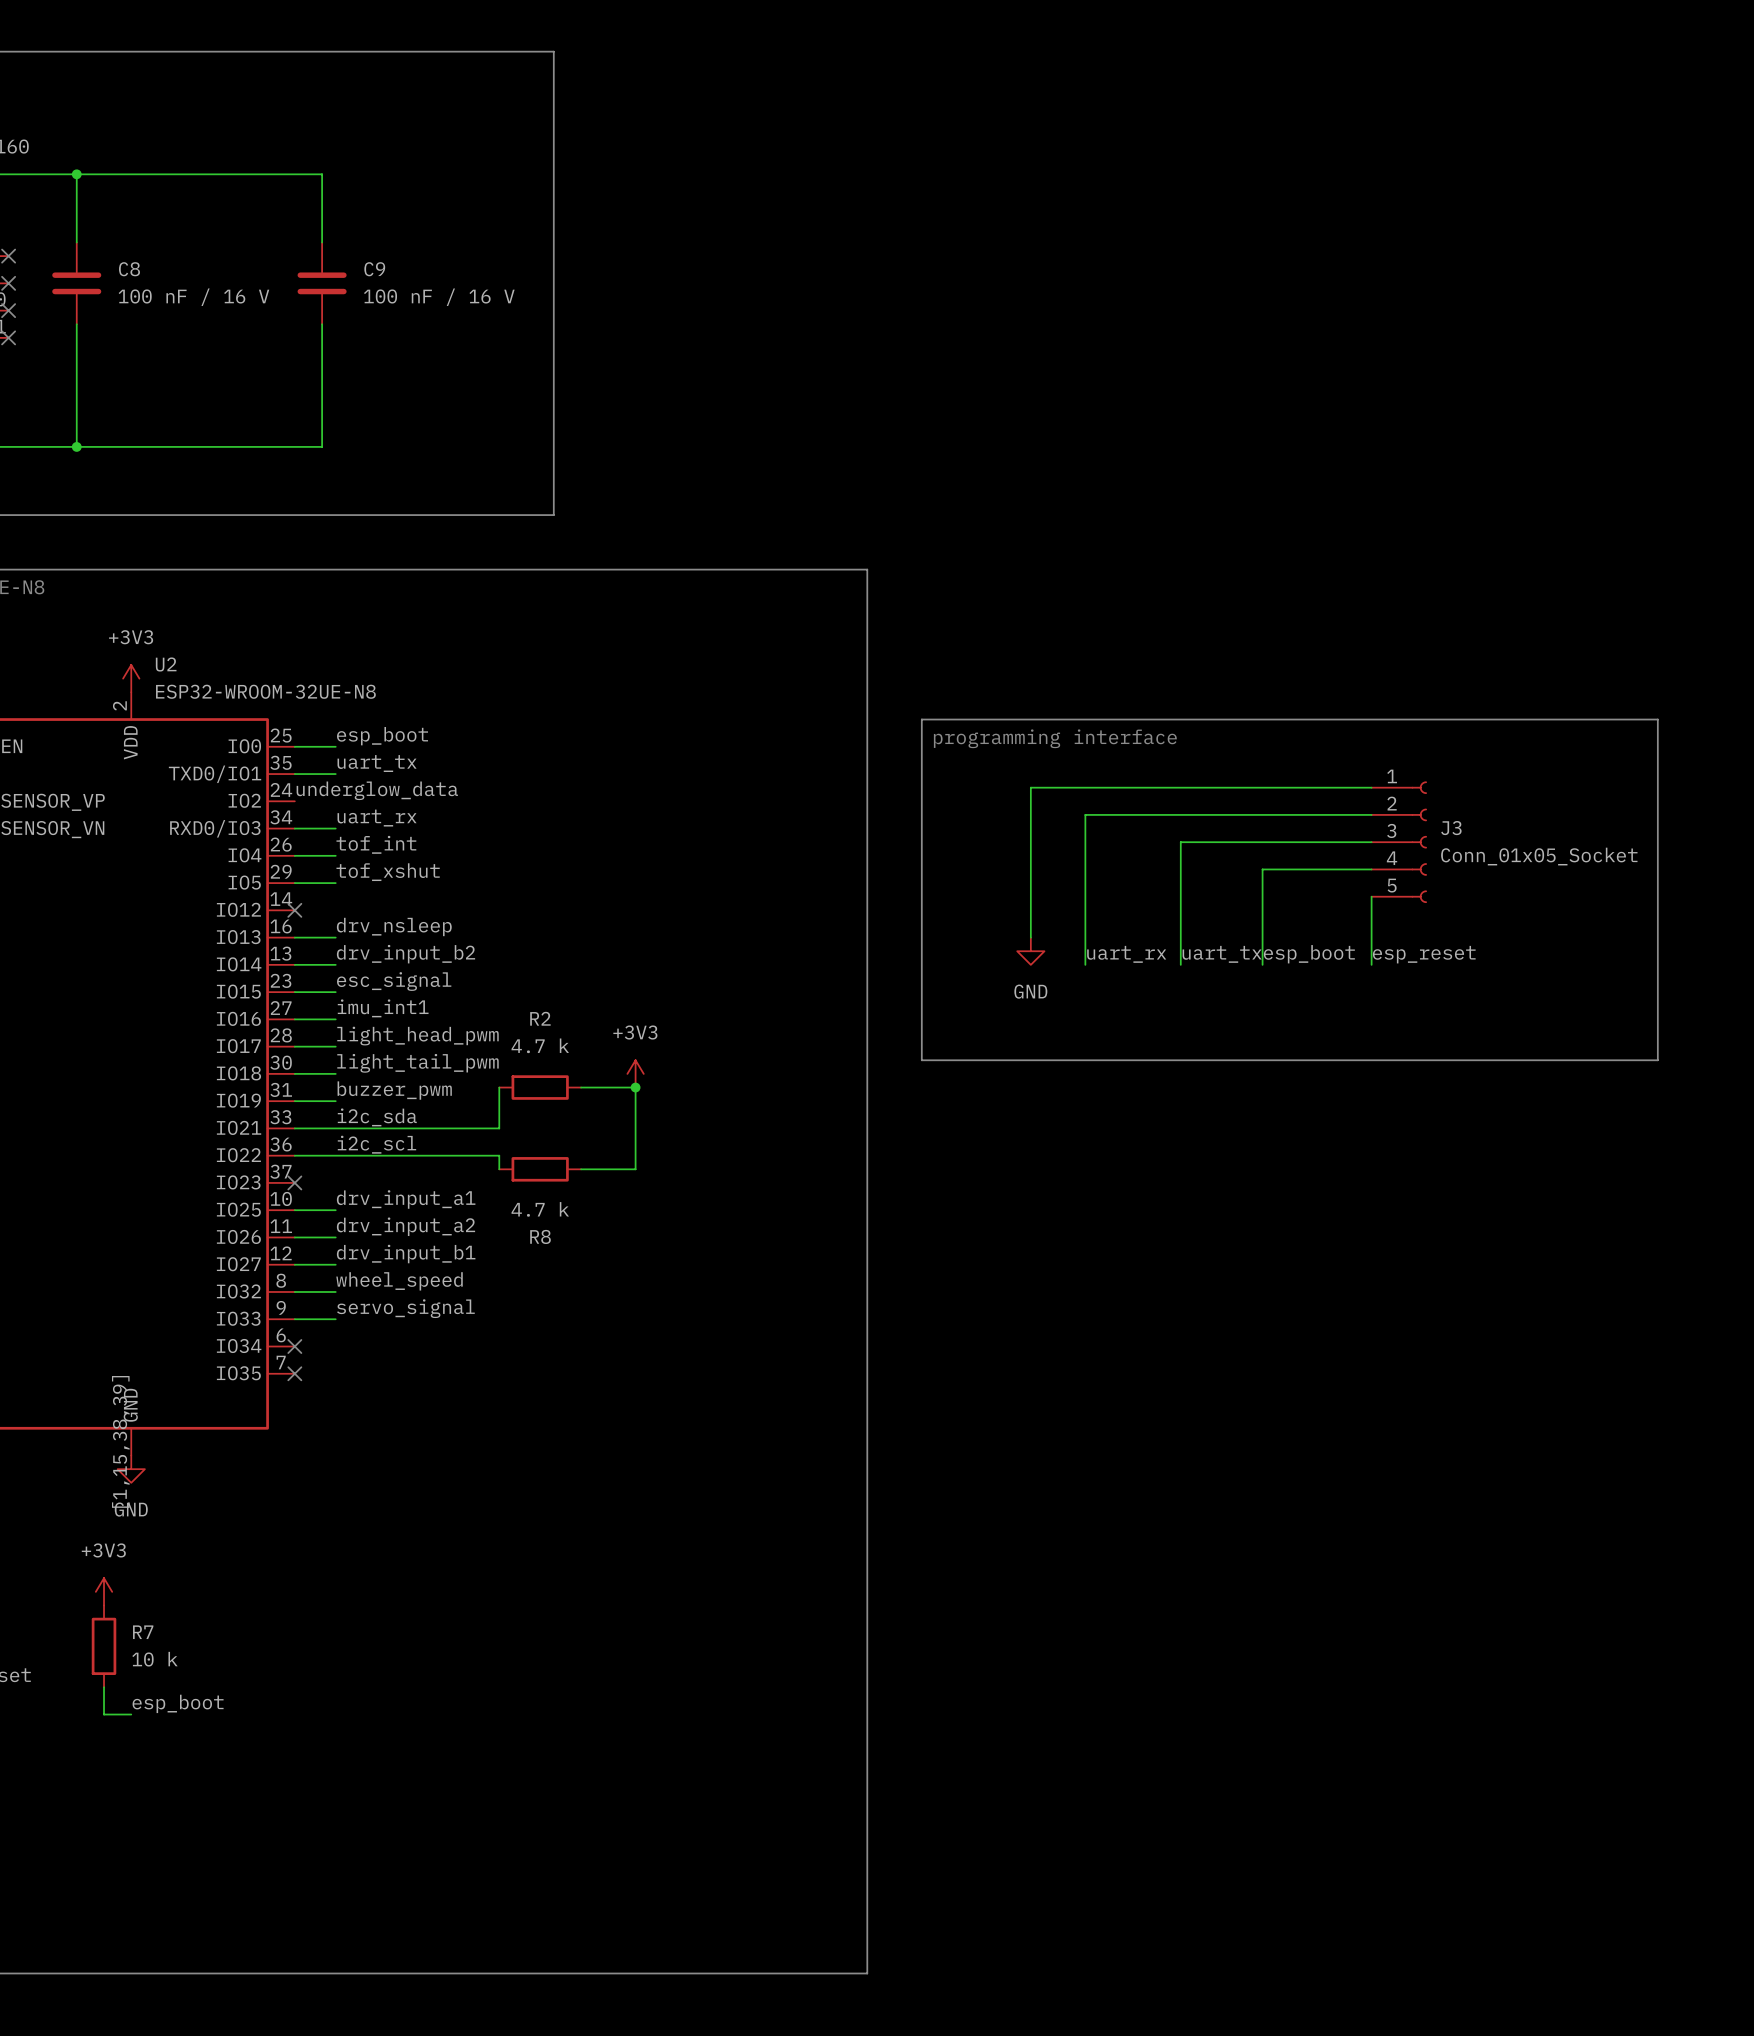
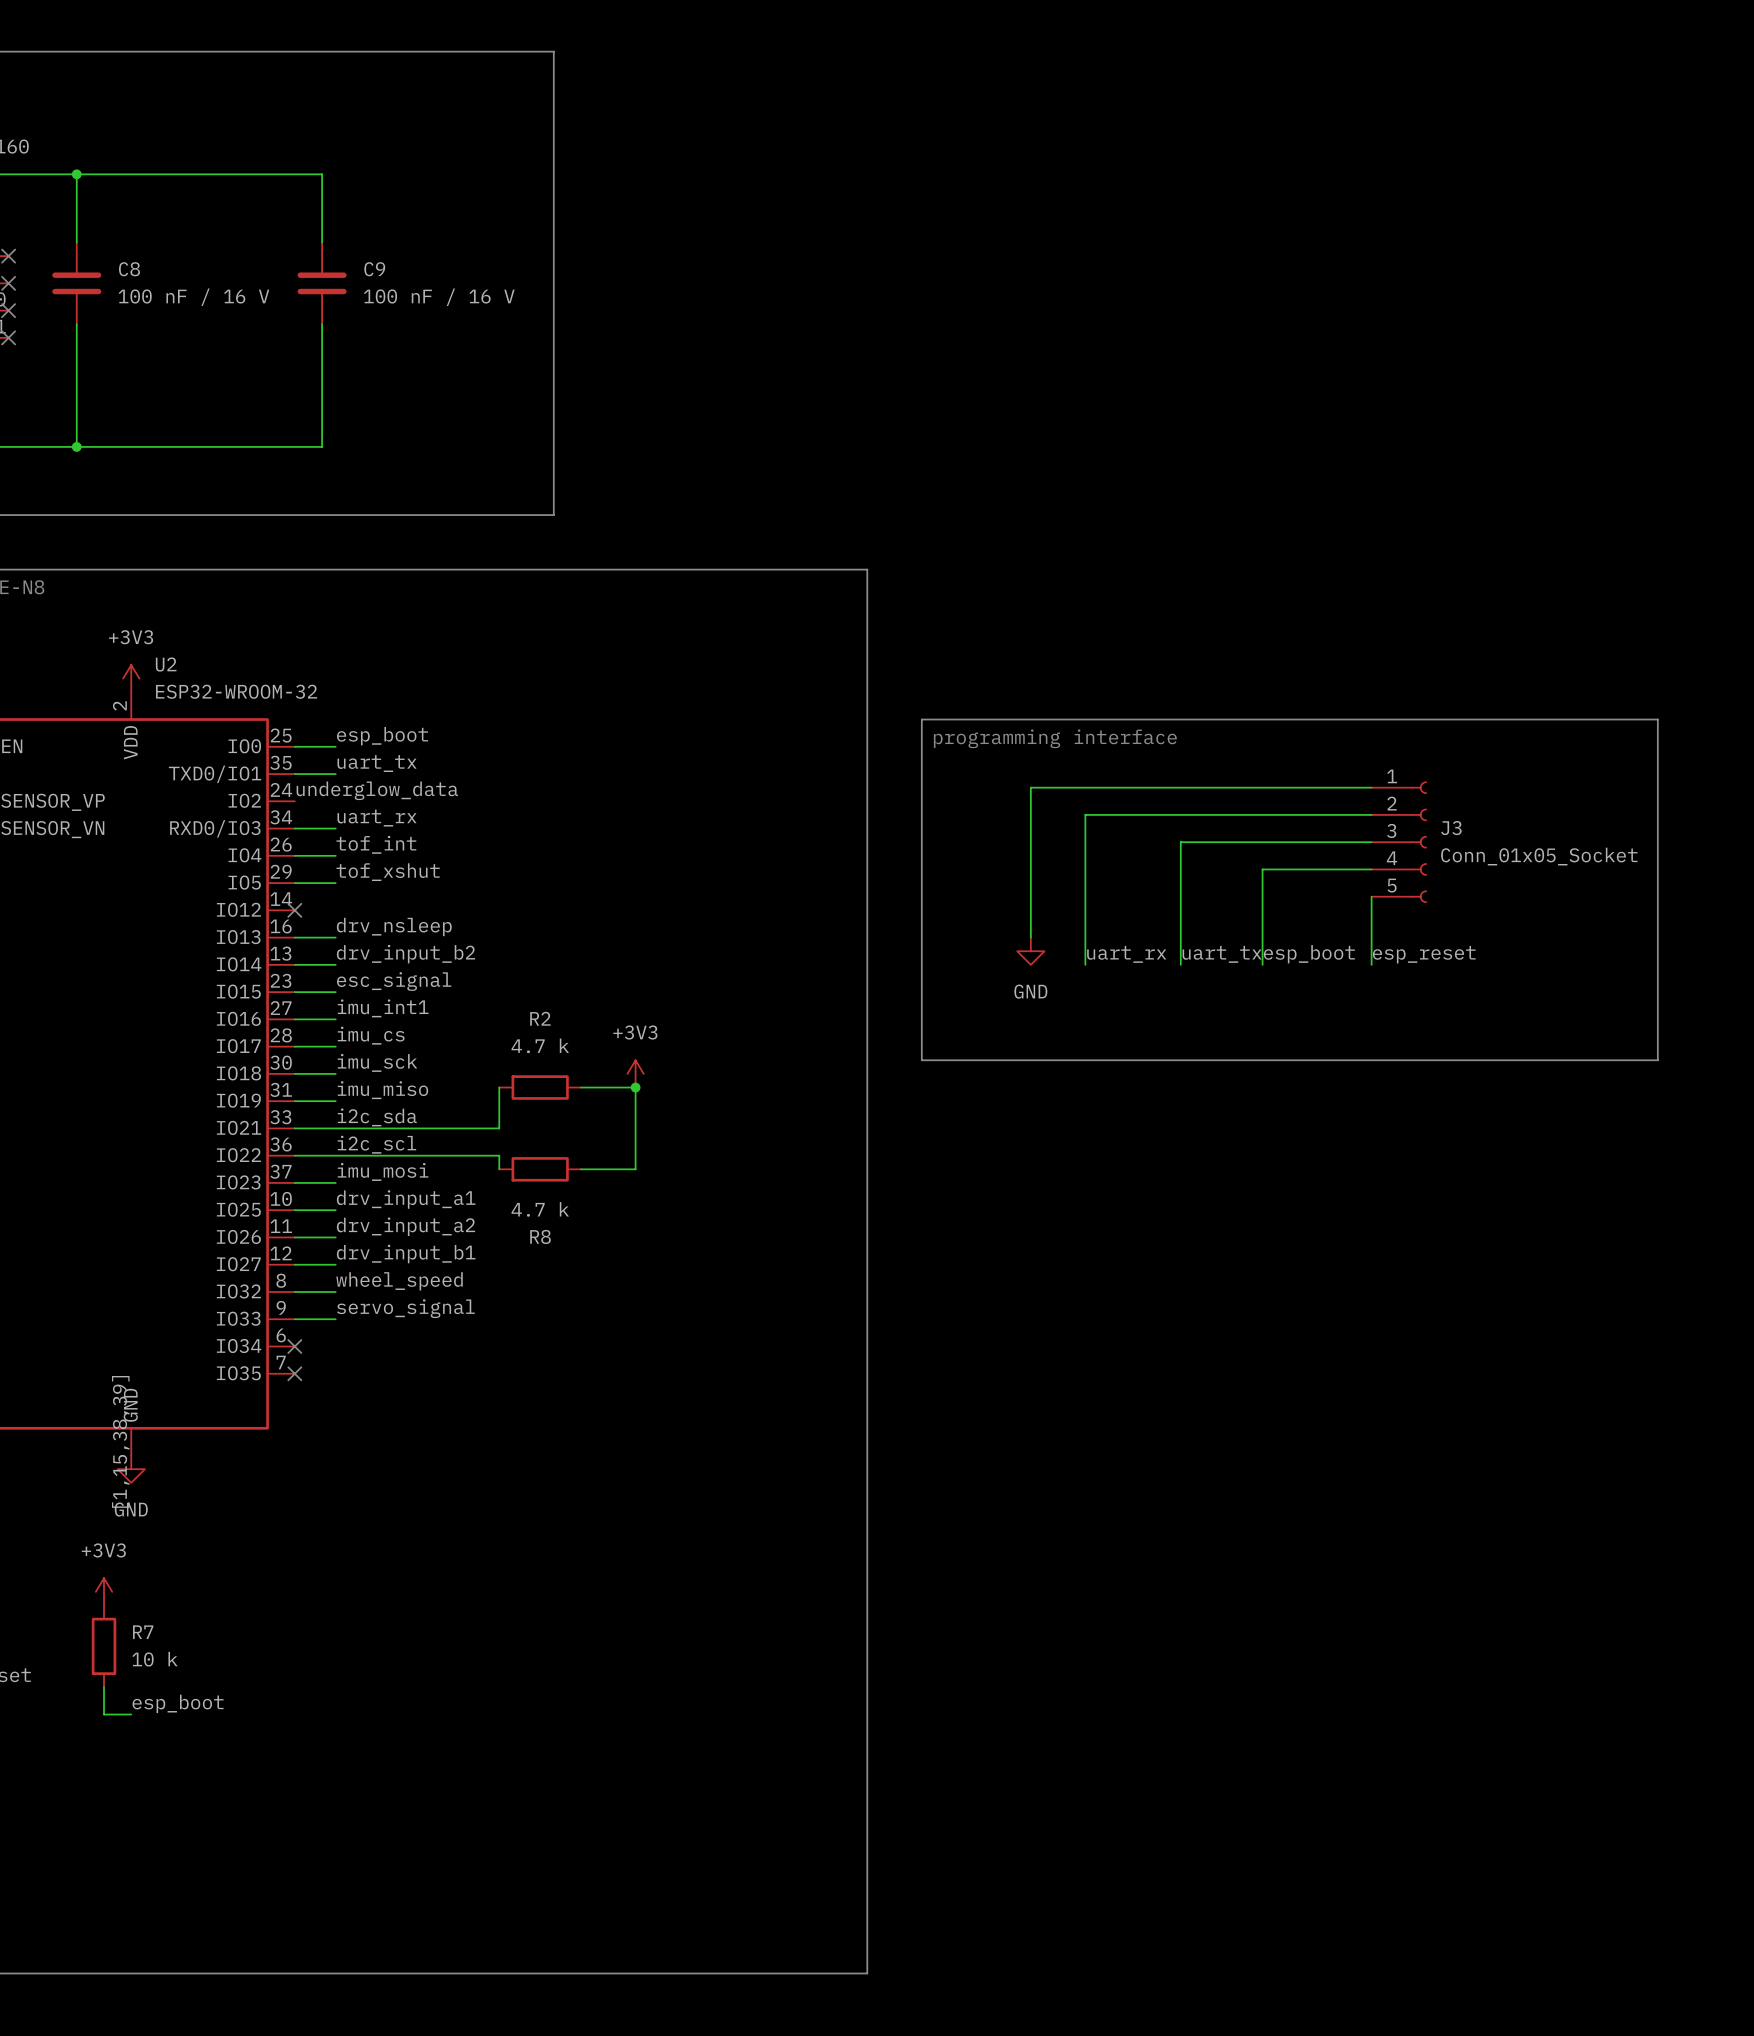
U2 value: ESP32-WROOM-32UE-N8 (265, 691) -> ESP32-WROOM-32 (236, 691)
label: light_head_pwm (417, 1036) -> imu_cs (371, 1035)
label: light_tail_pwm (417, 1063) -> imu_sck (377, 1062)
label: buzzer_pwm (394, 1090) -> imu_miso (382, 1090)
label: none -> imu_mosi (383, 1171)
wire: none -> (294, 1182) (335, 1182)
no-connect mark: (294, 1182) -> none

